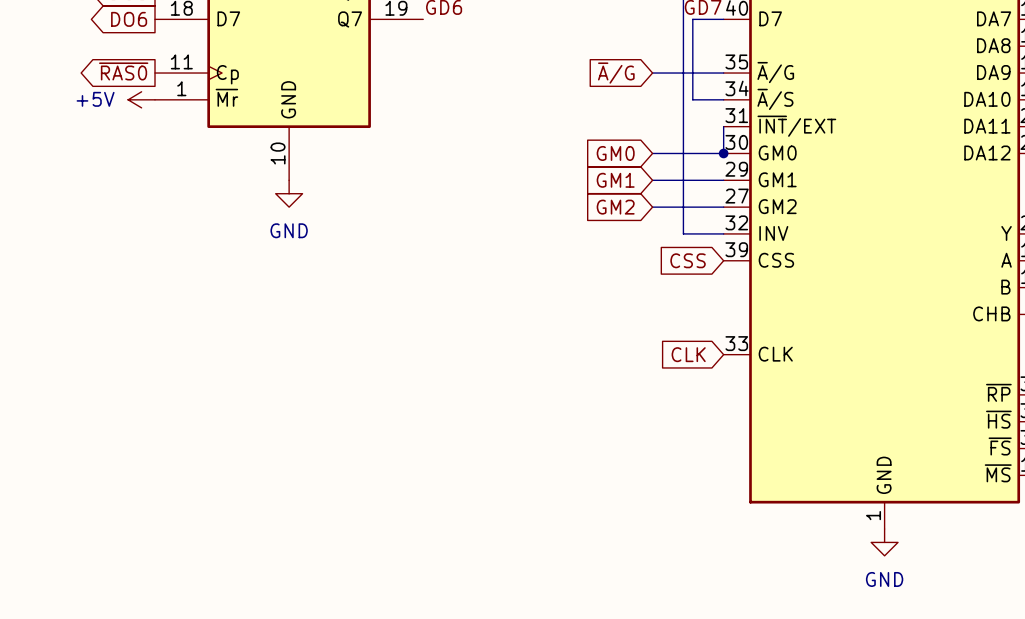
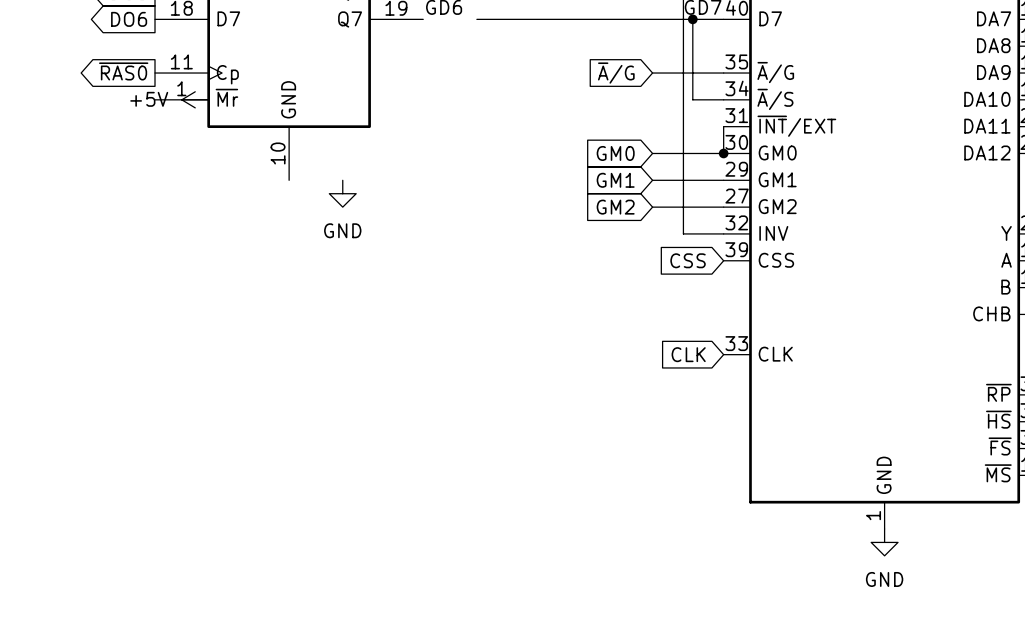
wire: none -> (476, 19) (692, 19)
junction: none -> (692, 19)
power symbol position: +5V (141, 99) -> +5V (195, 99)
power symbol position: GND (289, 193) -> GND (342, 193)

